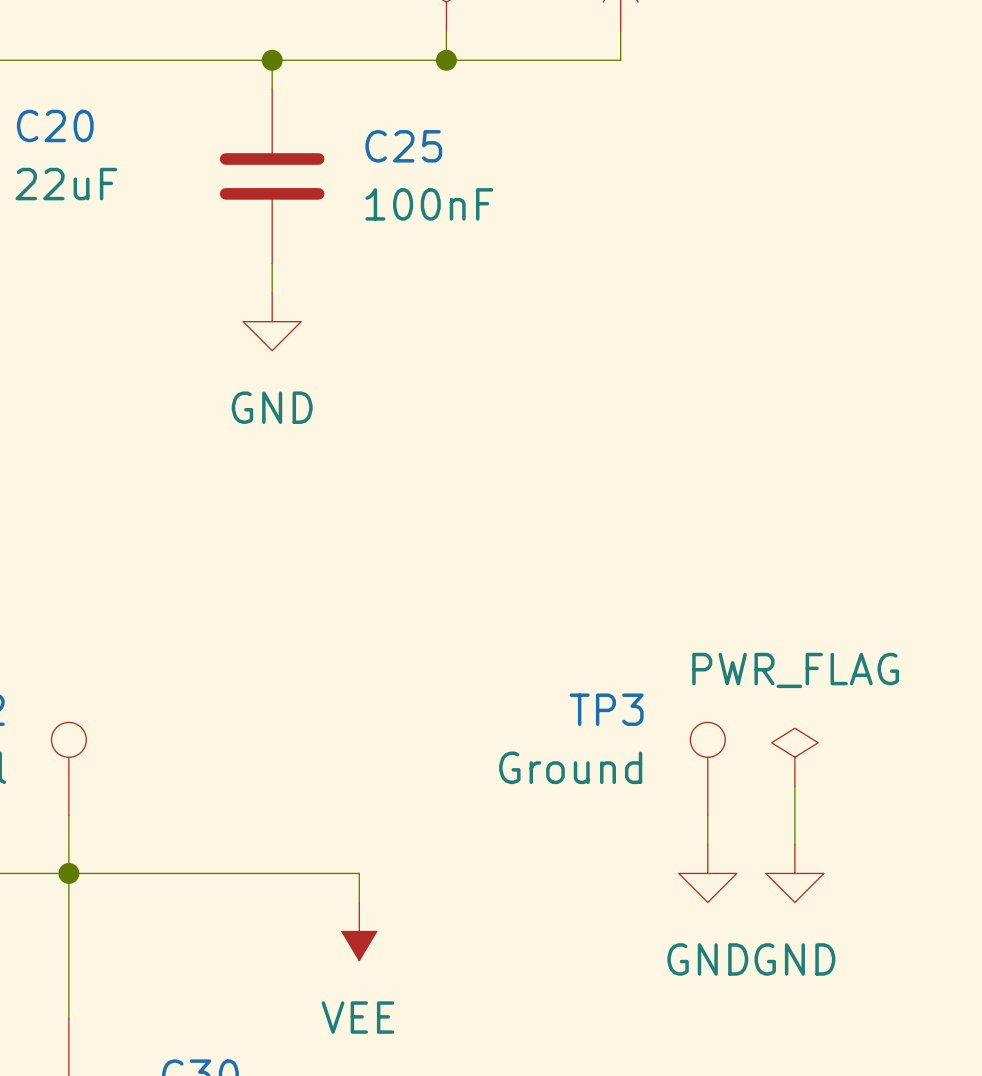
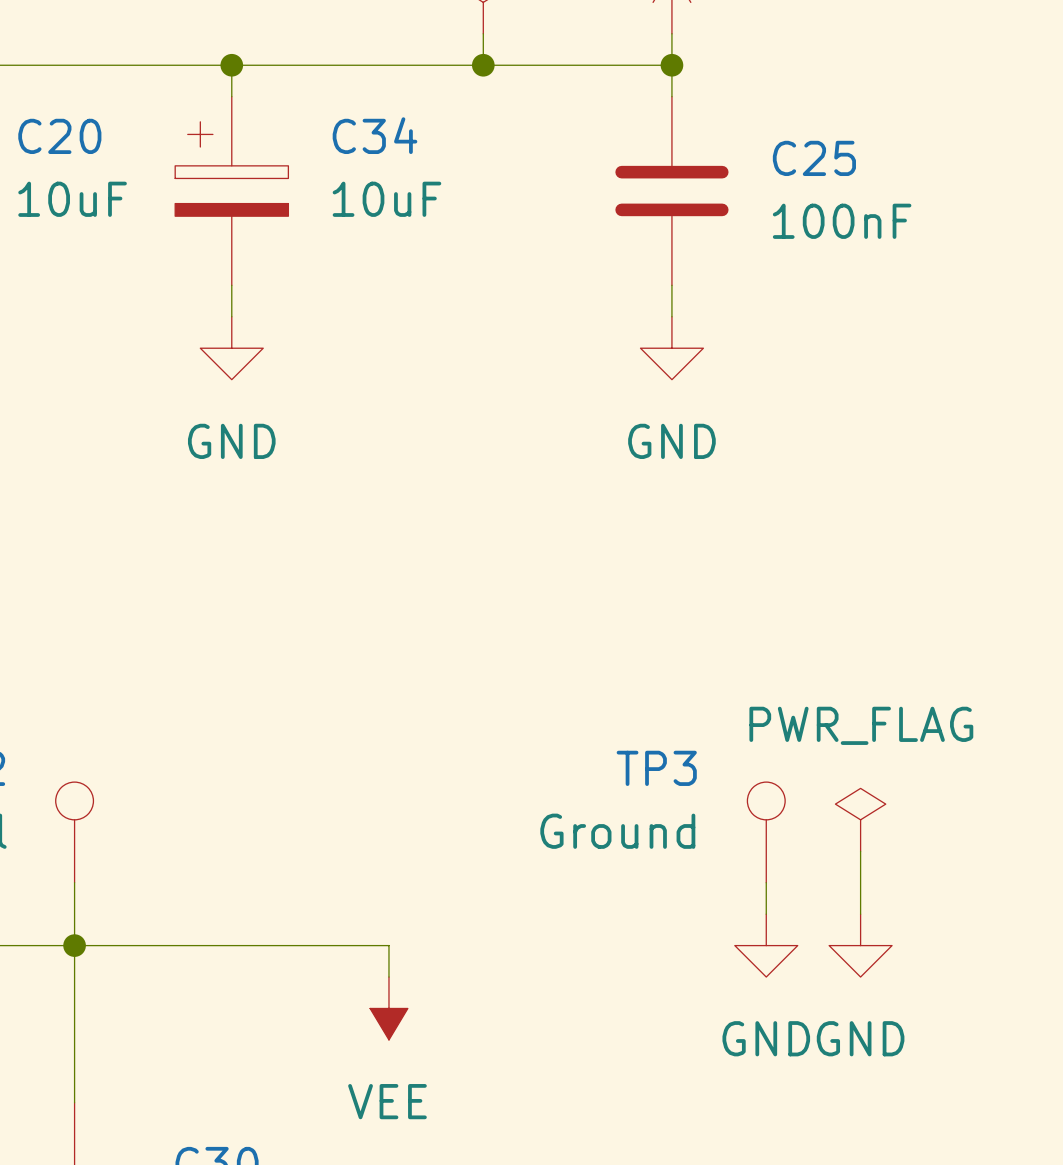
wire: (272, 60) (272, 89) -> (231, 65) (231, 96)
junction position: (272, 60) -> (231, 65)
wire: none -> (671, 65) (671, 96)
junction: none -> (671, 65)
C34: none -> 10uF (231, 191)
C25 position: (272, 176) -> (671, 191)
C20 value: 22uF (66, 184) -> 10uF (72, 199)
wire: (272, 263) (272, 292) -> (231, 285) (231, 316)
wire: none -> (671, 285) (671, 316)
power symbol position: GND (272, 321) -> GND (231, 348)
power symbol: none -> GND (671, 348)

